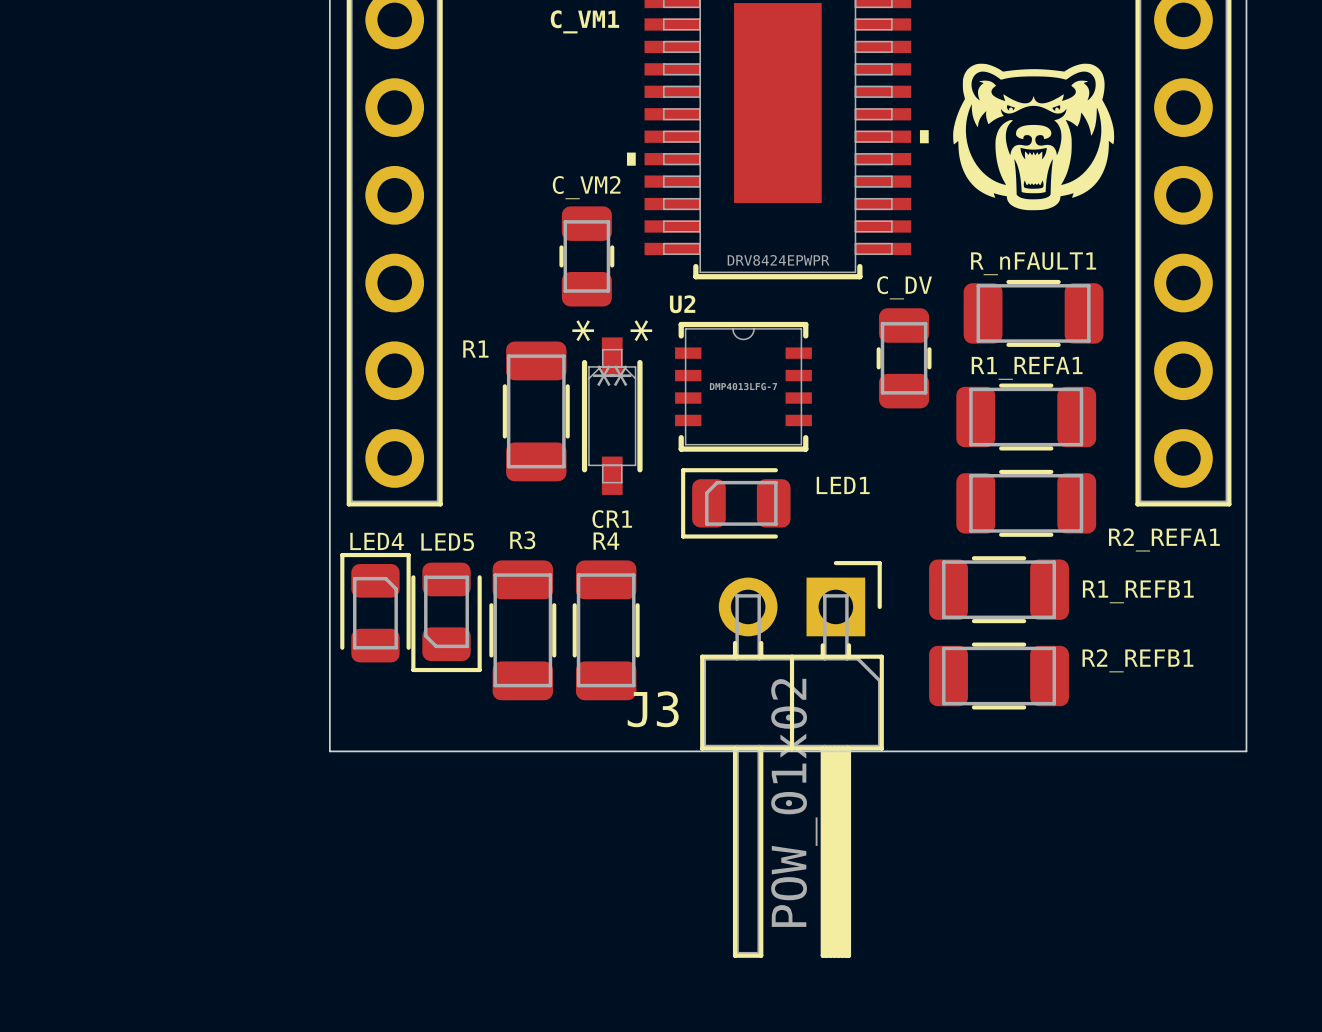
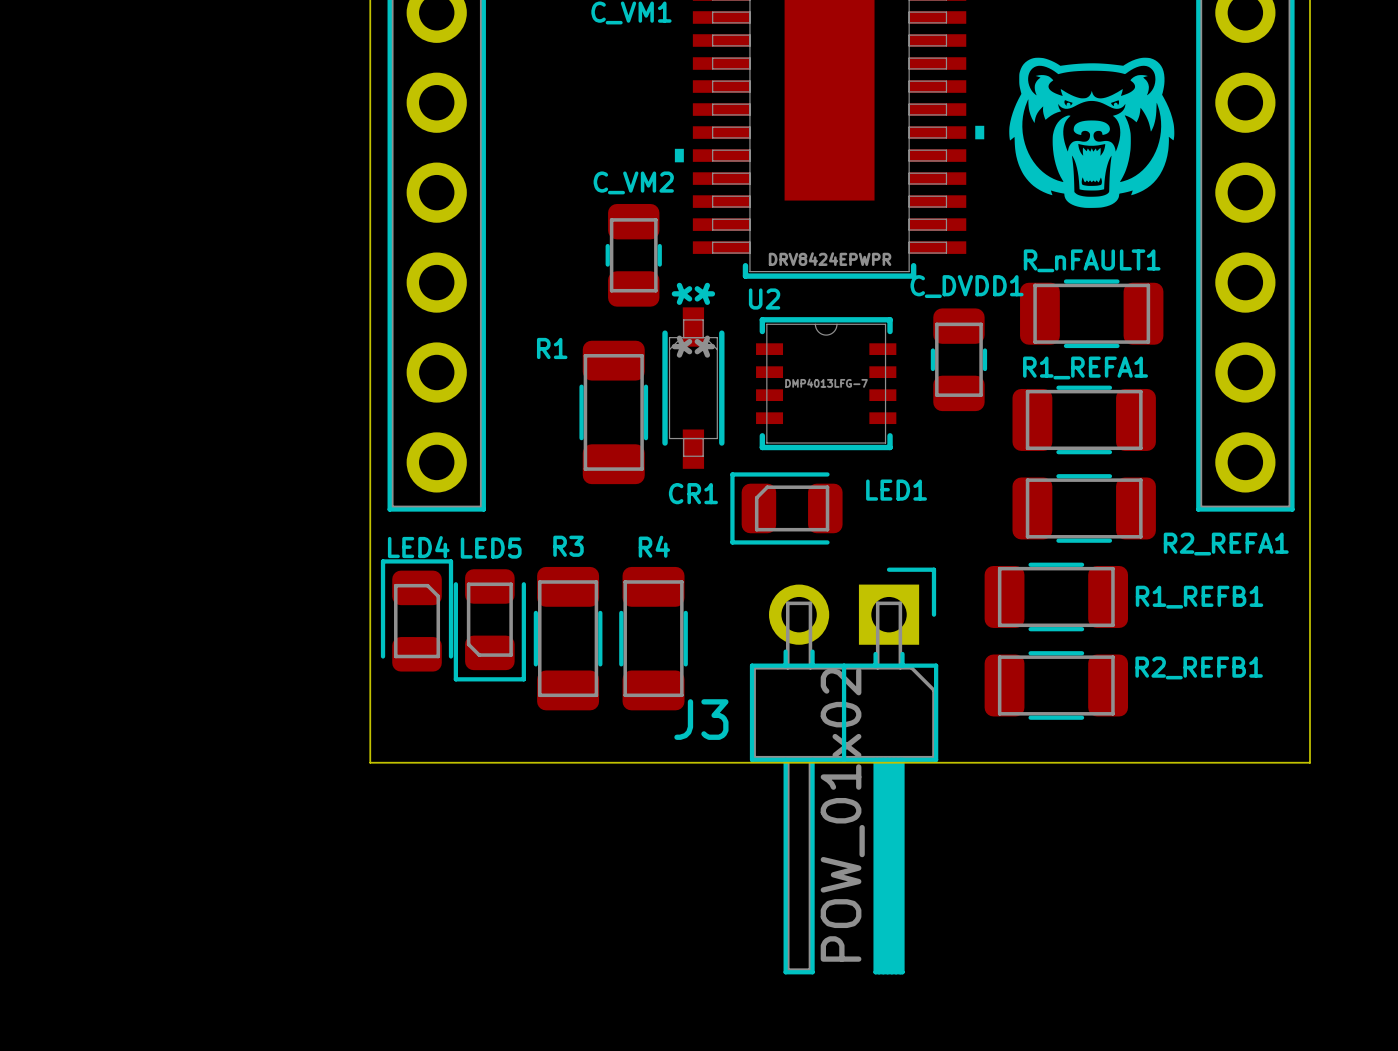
C_DV name: C_DV (904, 287) -> C_DVDD1 (967, 286)
CR1 footprint: [581, 337, 643, 495] -> [662, 307, 725, 469]
U2 position: (743, 386) -> (826, 383)
R1 position: (536, 411) -> (613, 412)

